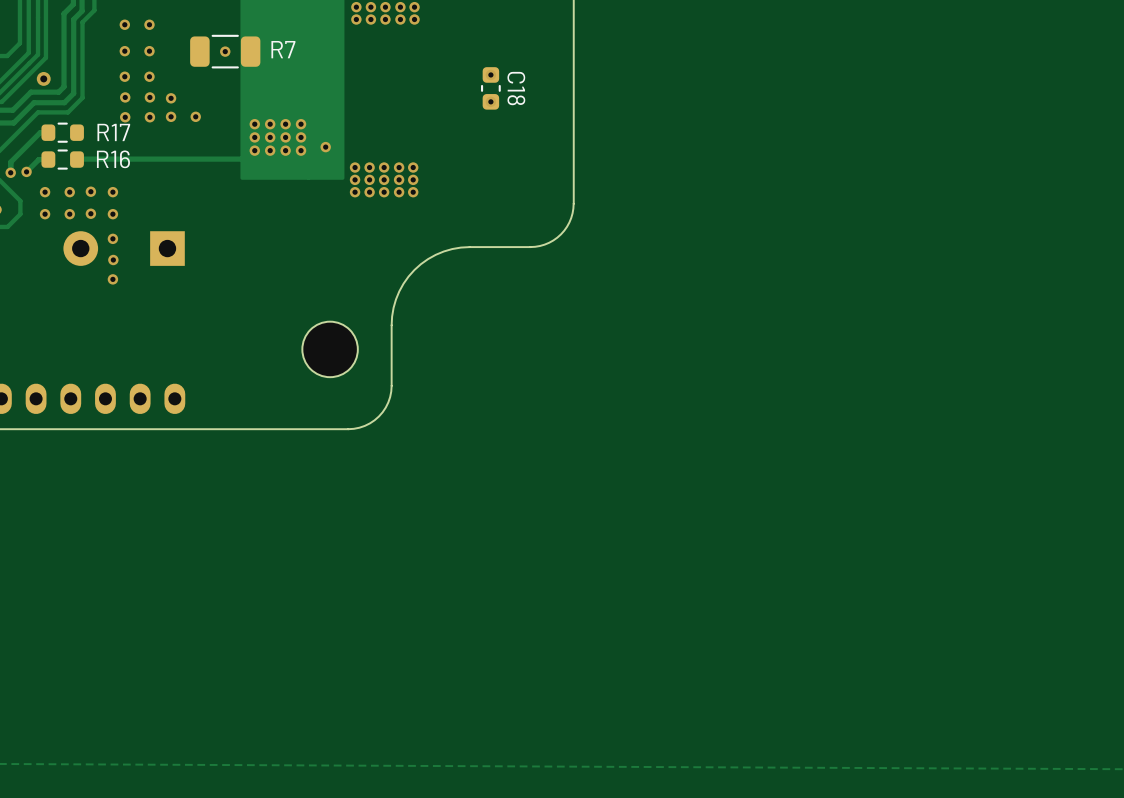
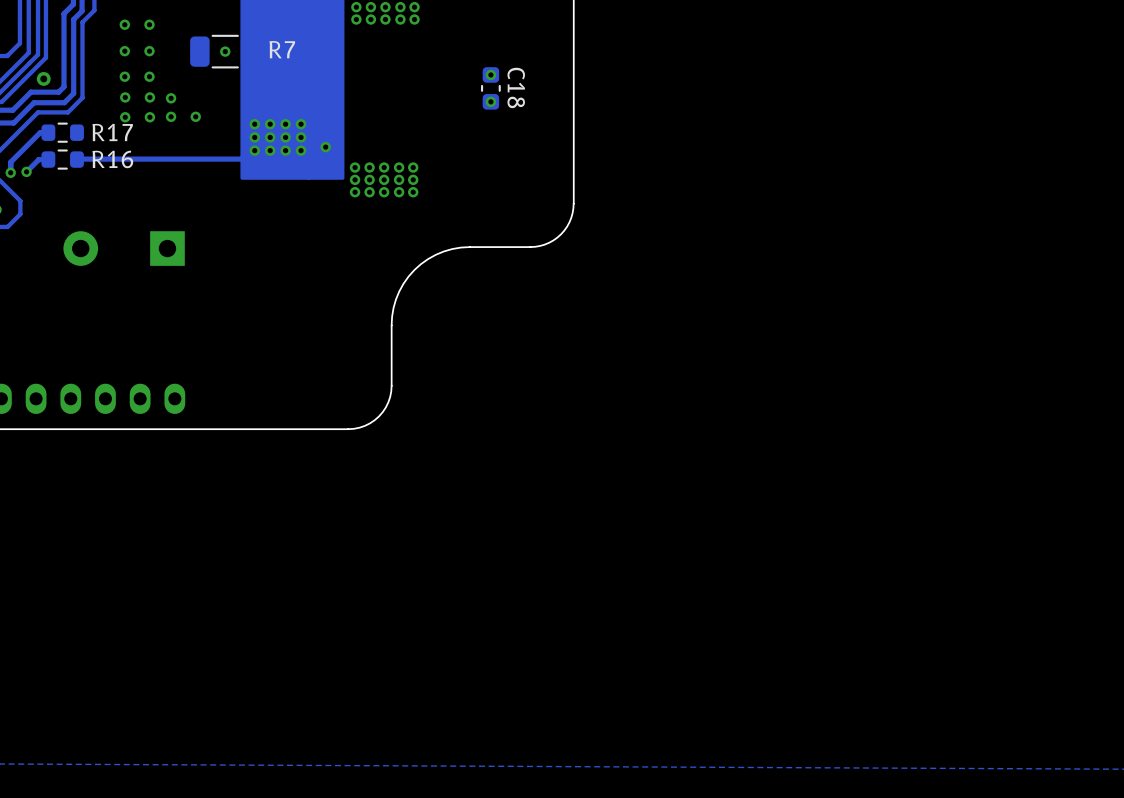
via: (90, 191) -> none
via: (45, 192) -> none
via: (69, 192) -> none
via: (112, 192) -> none
via: (90, 213) -> none
via: (45, 214) -> none
via: (69, 214) -> none
via: (112, 214) -> none
via: (112, 238) -> none
via: (113, 259) -> none
via: (112, 279) -> none
part: (330, 349) -> none

